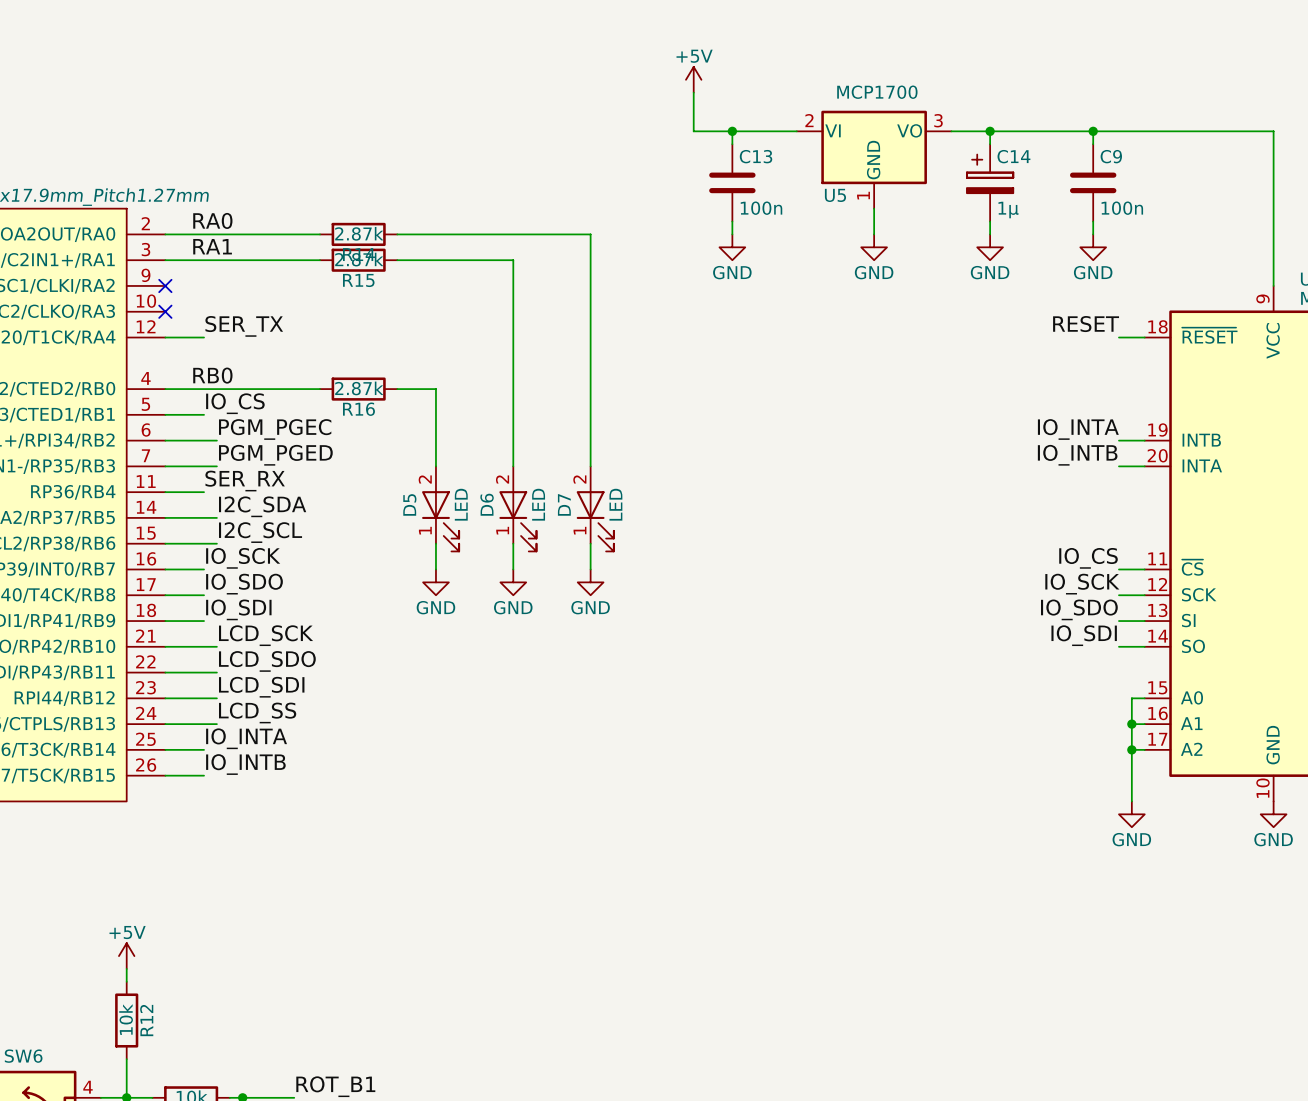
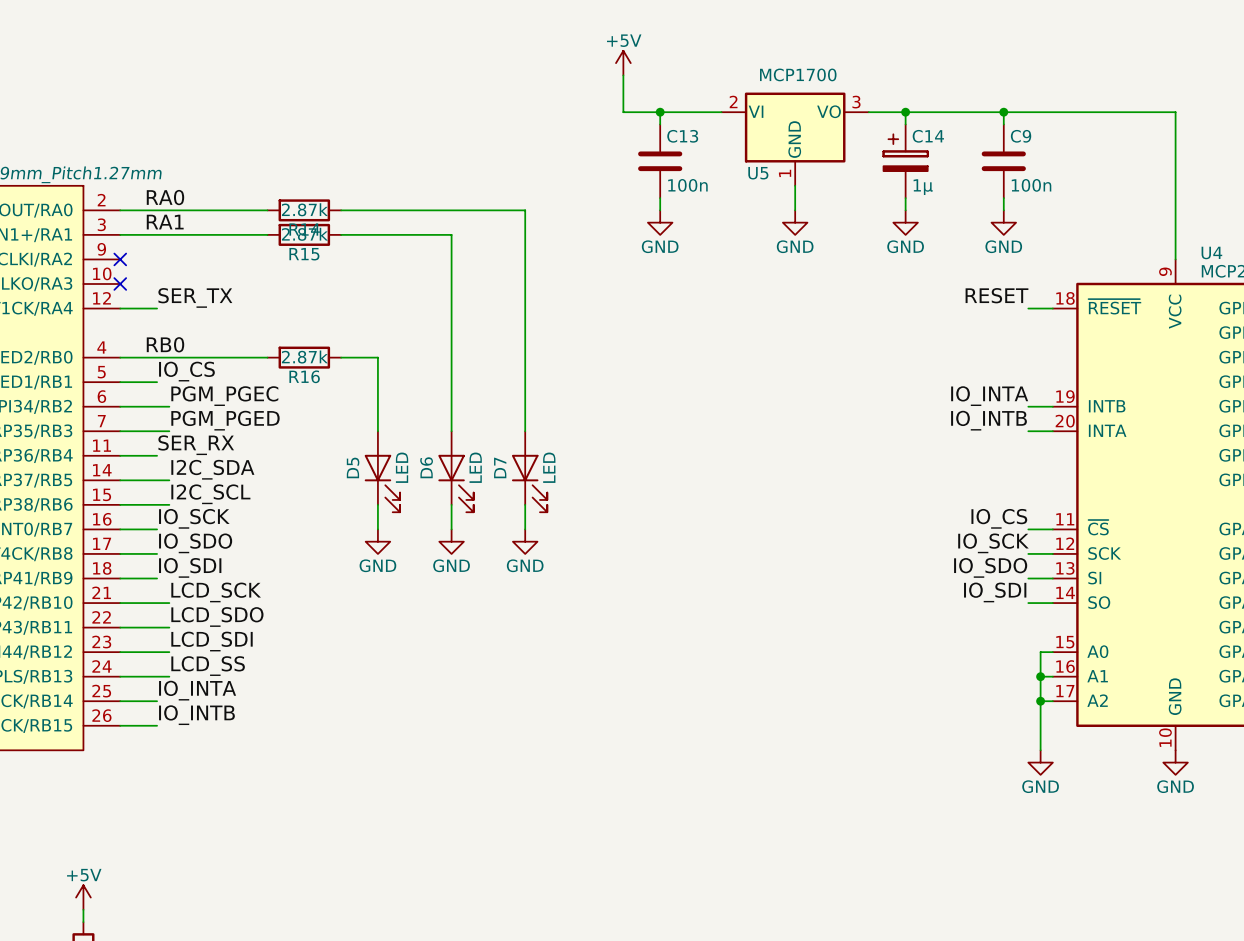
D5 pin number: 2 (425, 479) -> none
D6 pin number: 2 (502, 479) -> none
D7 pin number: 2 (579, 479) -> none
D5 pin number: 1 (425, 530) -> none
D6 pin number: 1 (502, 530) -> none
D7 pin number: 1 (579, 530) -> none

